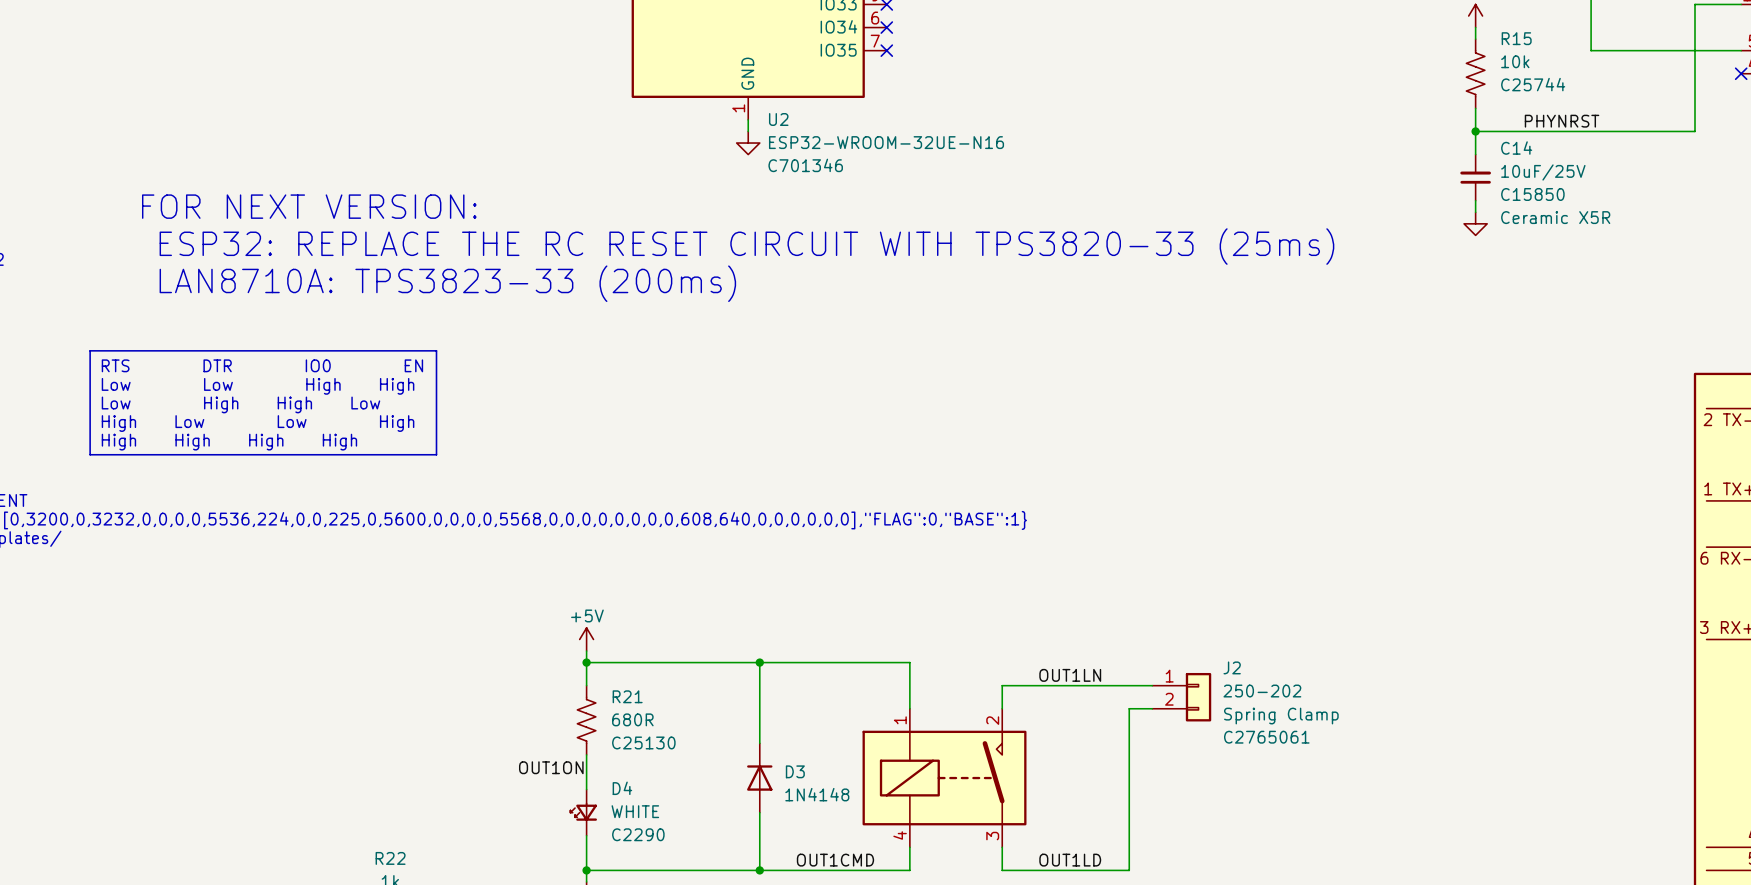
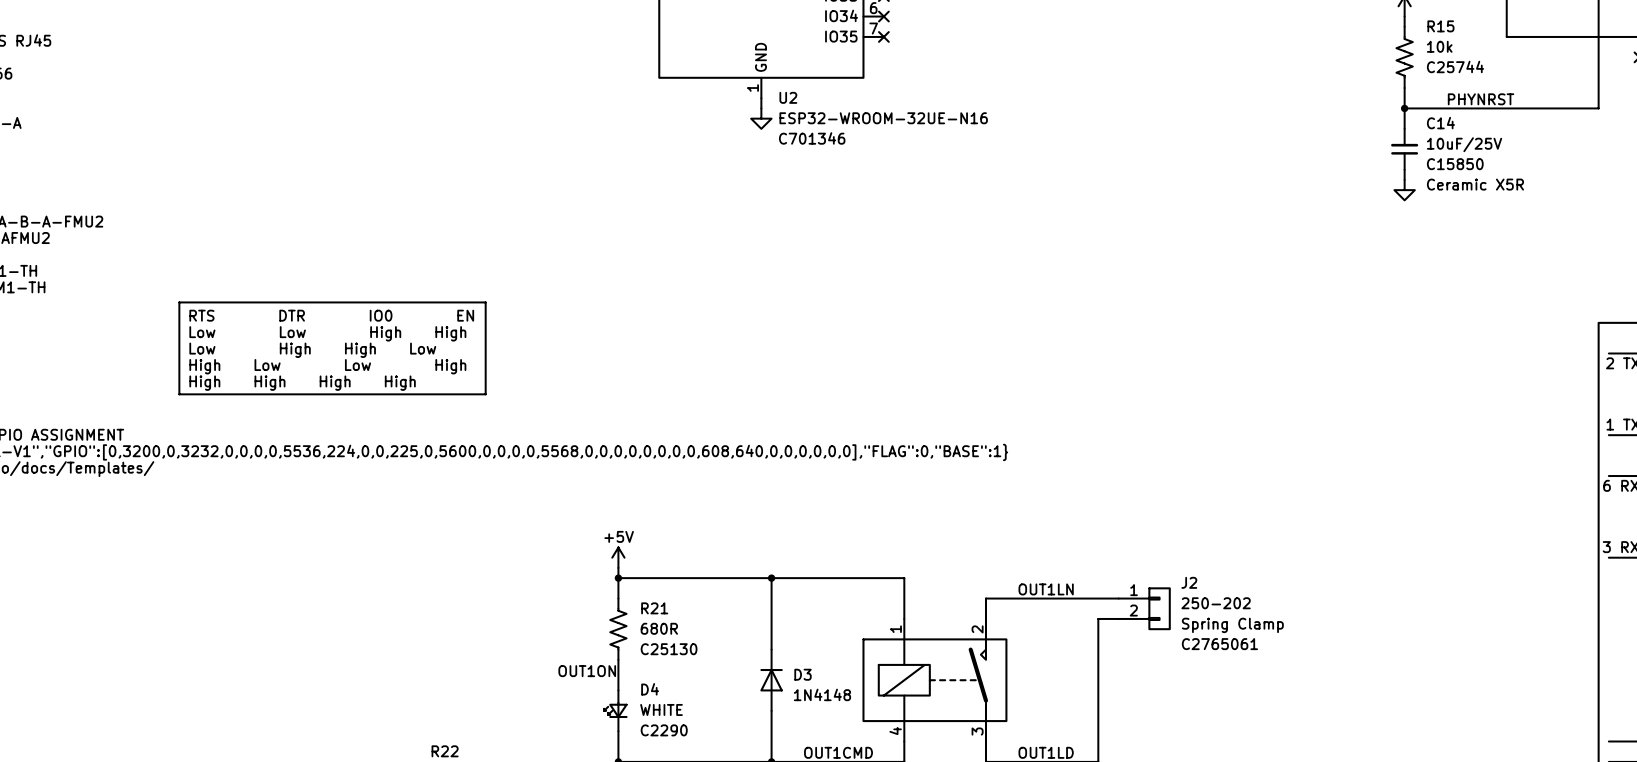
text: FOR NEXT VERSION: (309, 206) -> none
text: ESP32: REPLACE THE RC RESET CIRCUIT WITH TPS3820-33 (25ms) (746, 246) -> none
text: LAN8710A: TPS3823-33 (200ms) (447, 283) -> none

